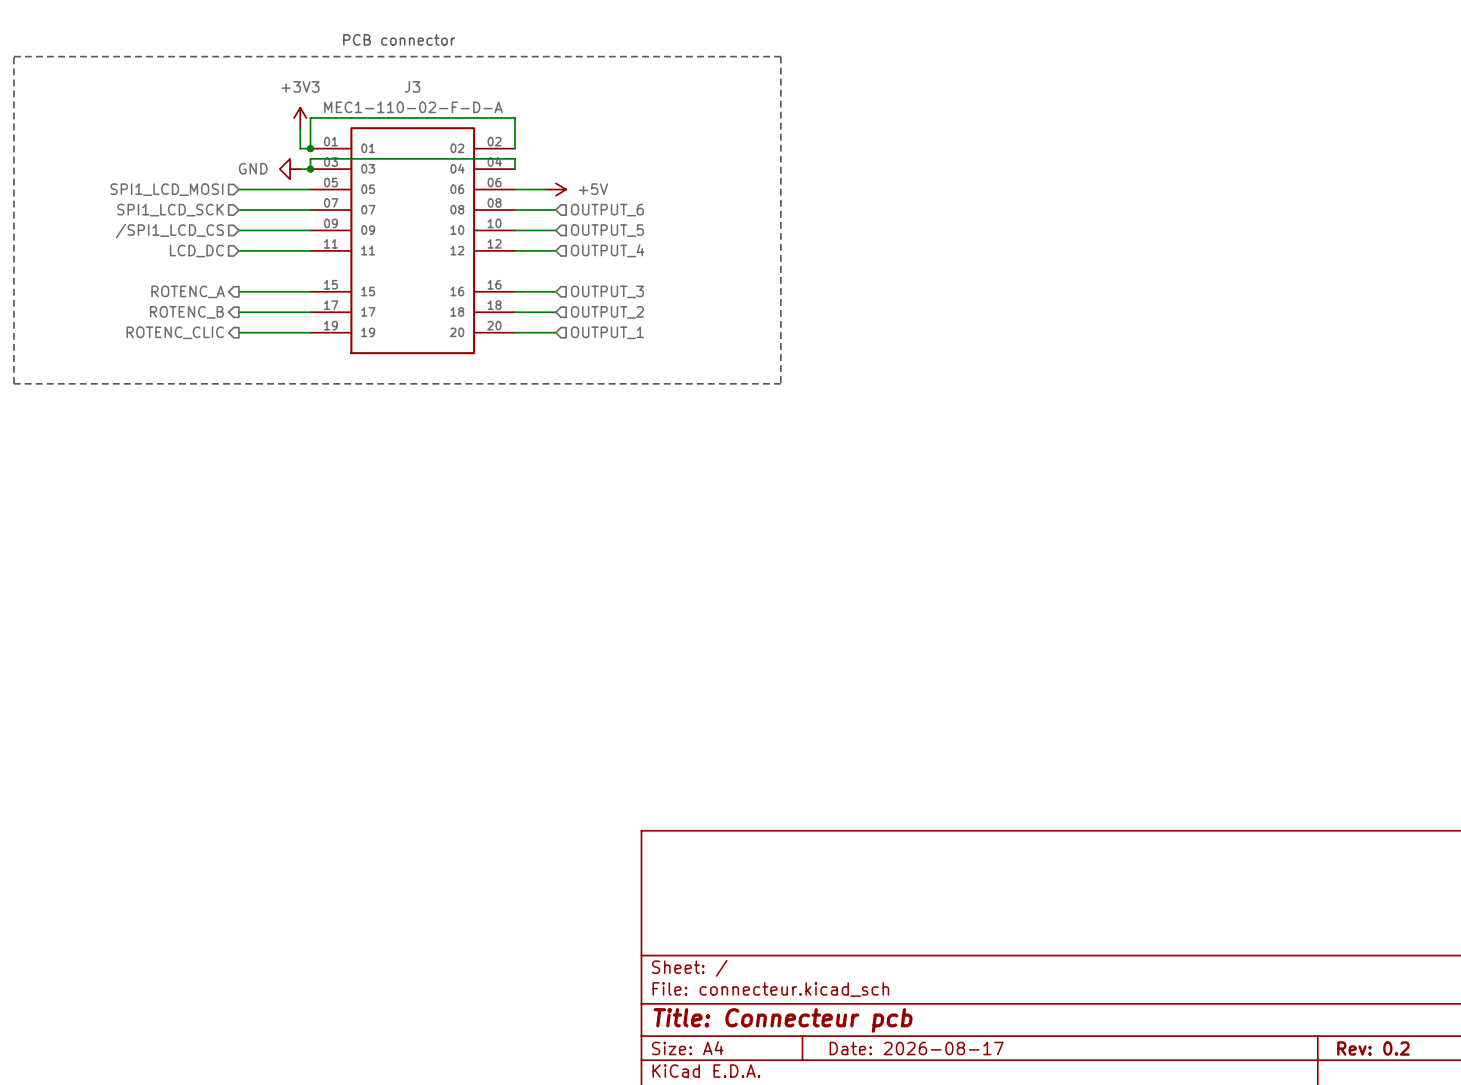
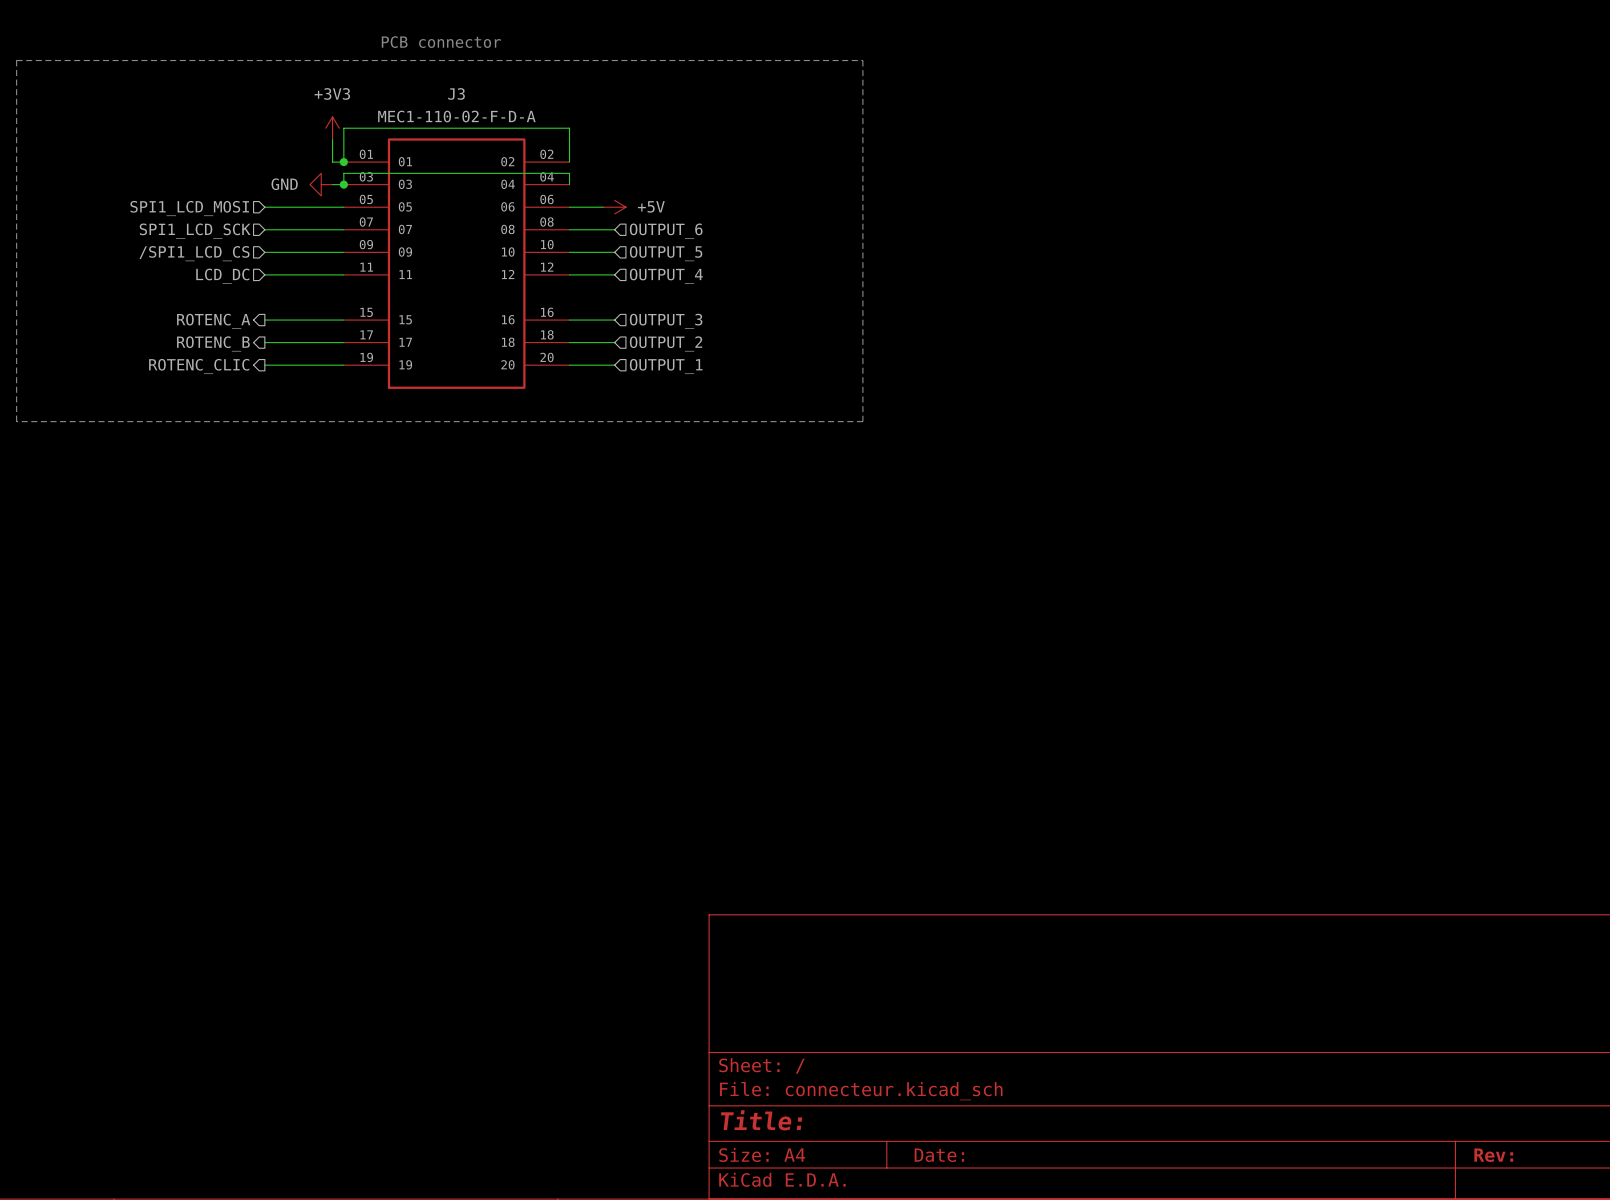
title block: Title: Connecteur pcb (783, 1020) -> Title: (761, 1120)
title block: Date: 2026-08-17 (916, 1048) -> Date: (939, 1155)
title block: Rev: 0.2 (1373, 1048) -> Rev: (1493, 1155)

